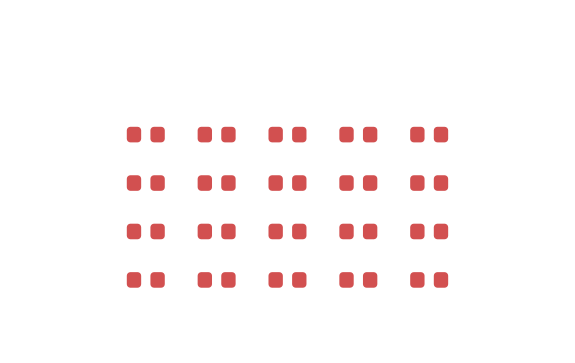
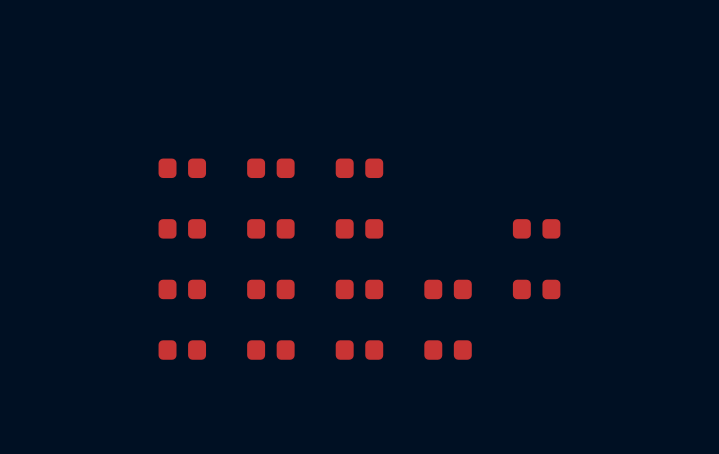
part: (358, 134) -> none
part: (429, 134) -> none
part: (358, 183) -> none
part: (429, 279) -> none

